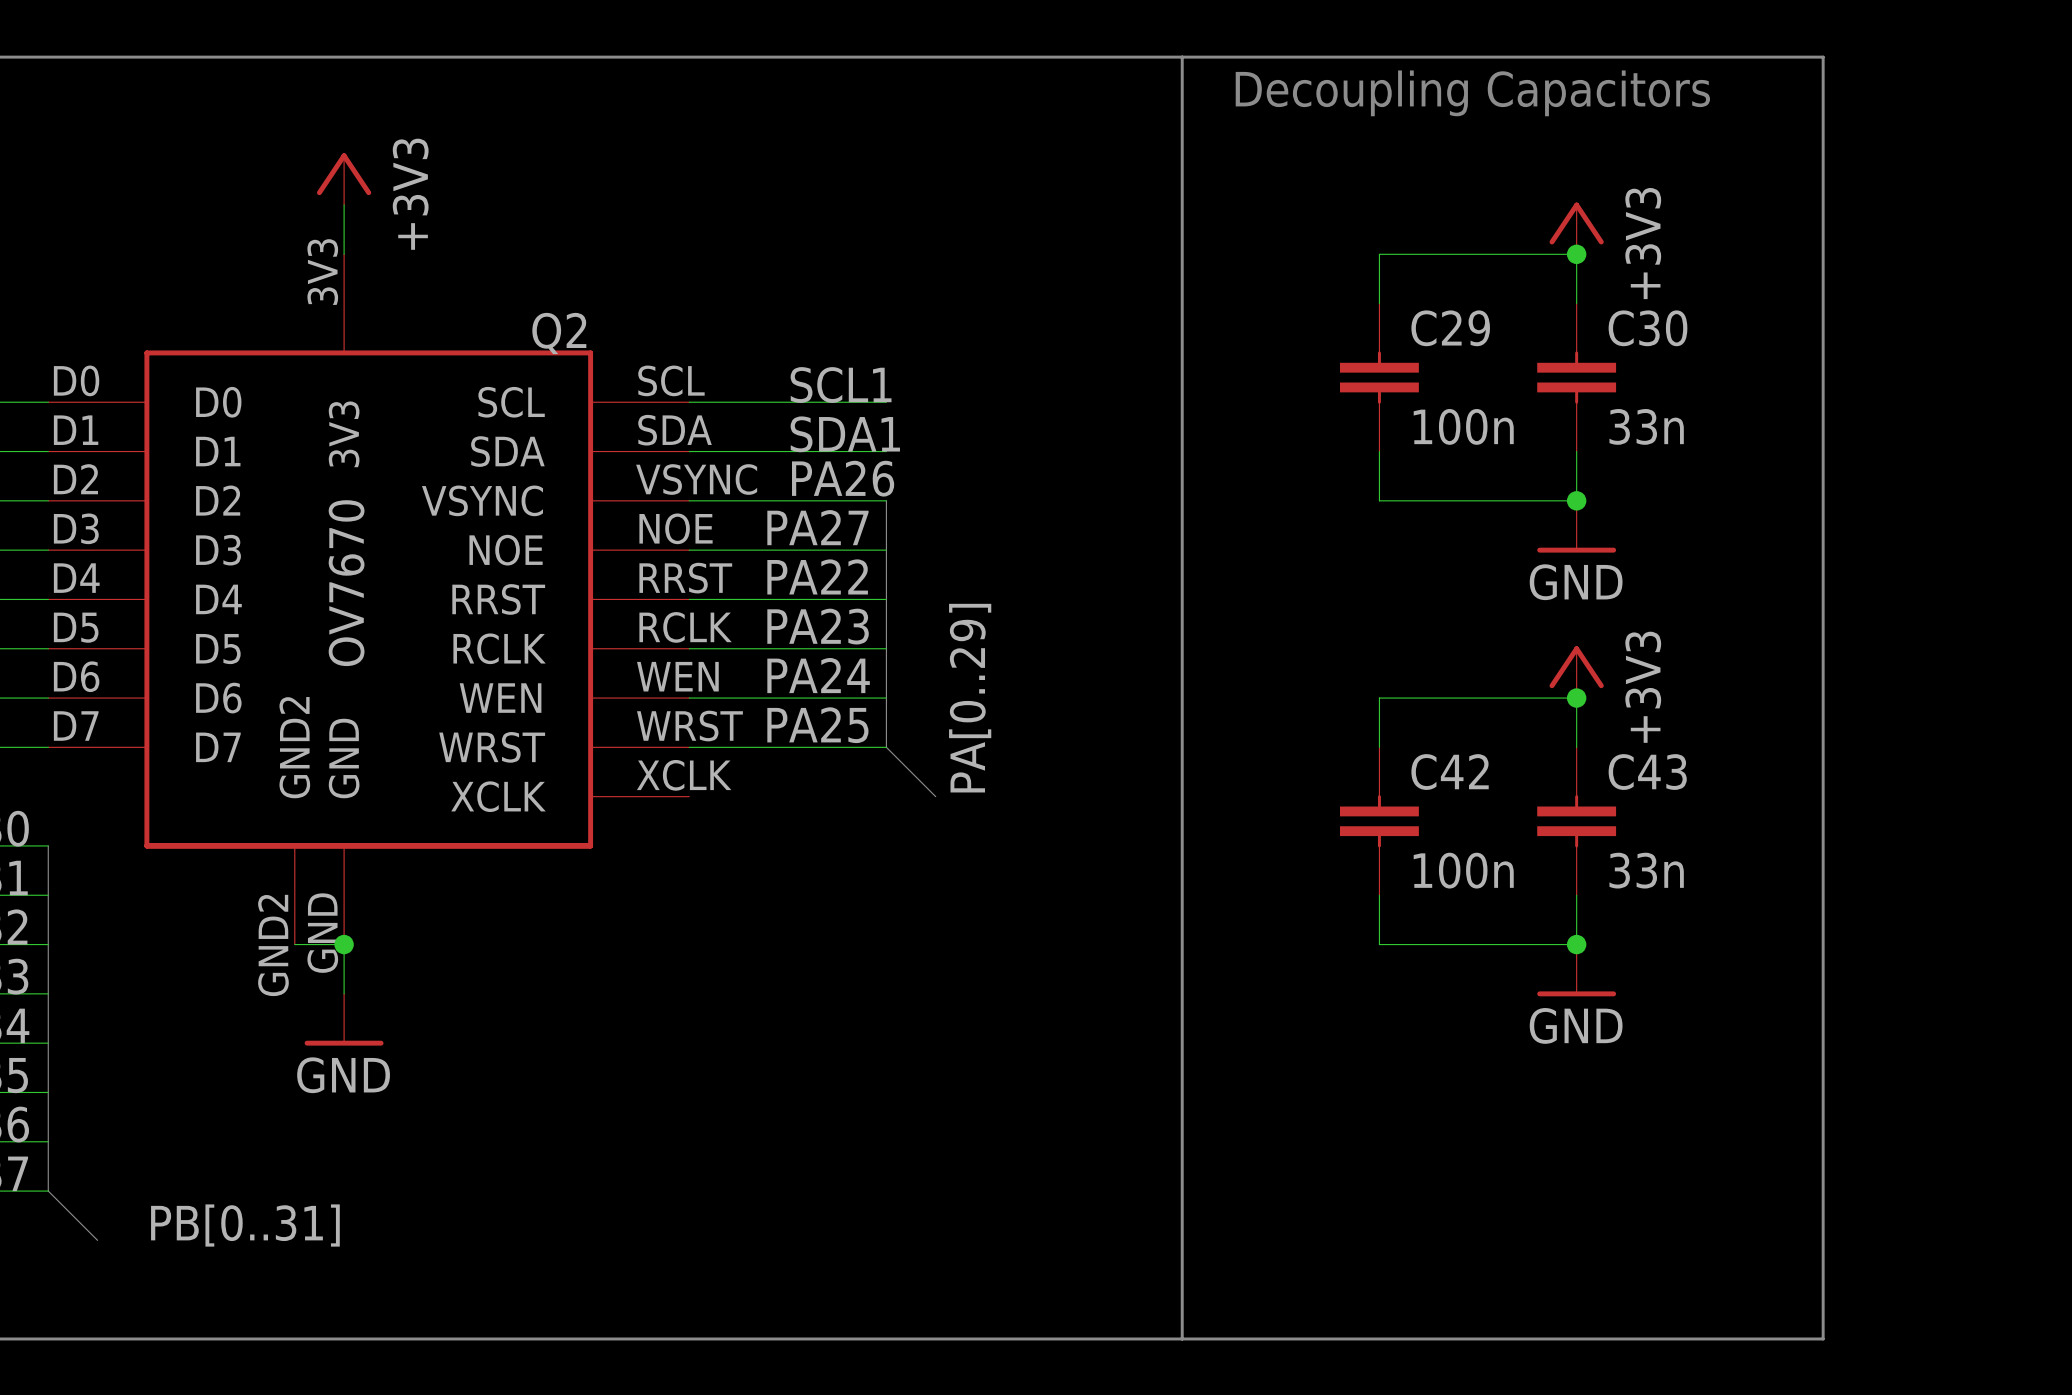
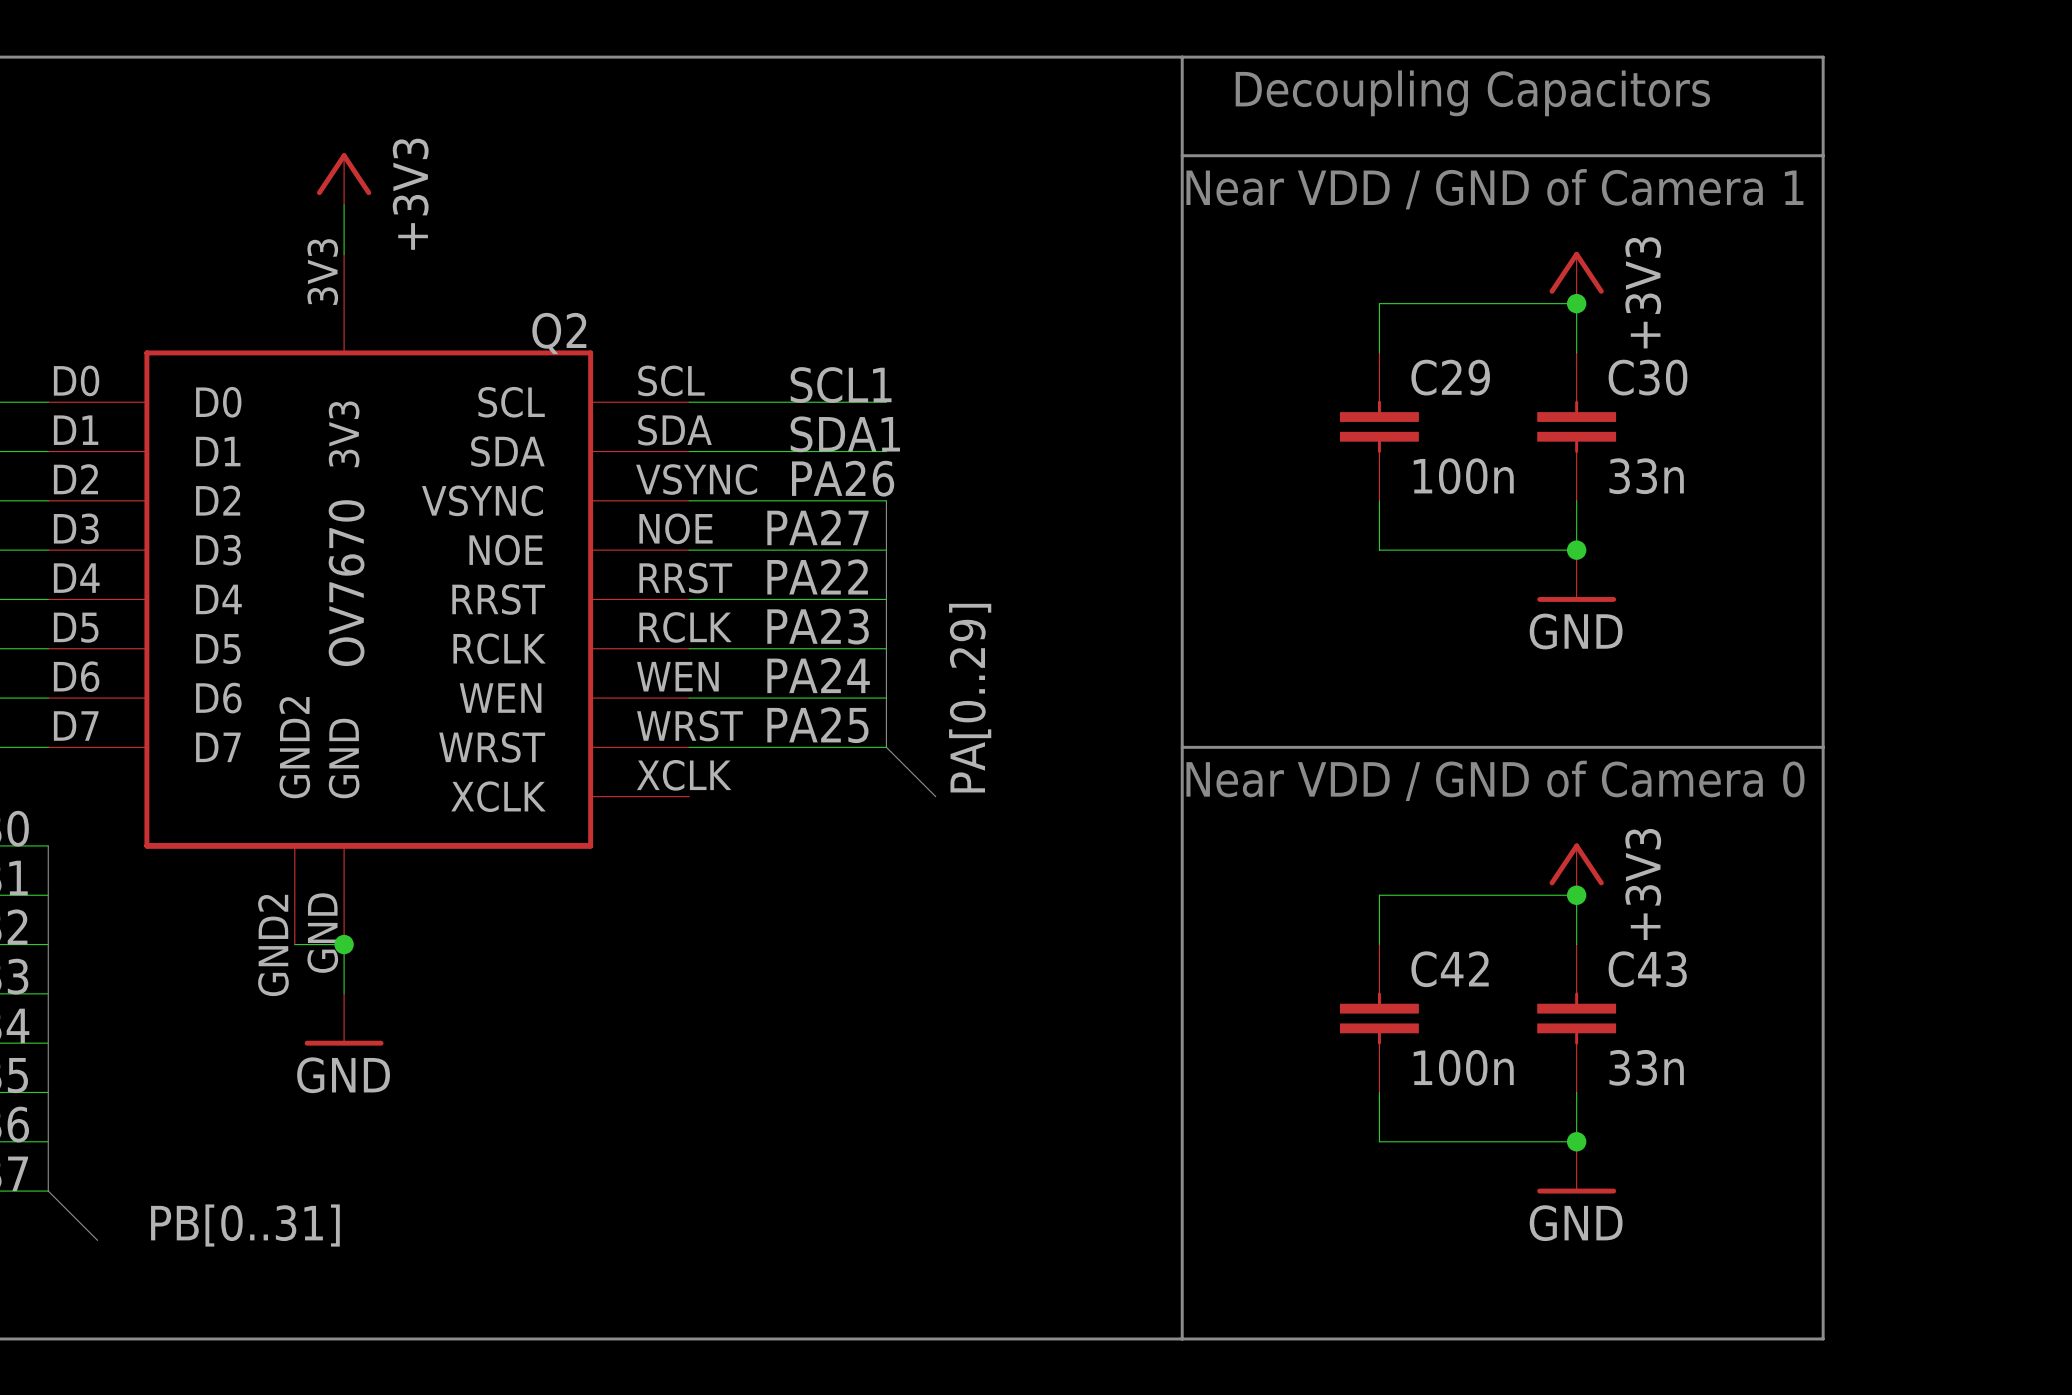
line: none -> (1182, 155) (1823, 155)
text: none -> Near VDD / GND of Camera 1 (1494, 189)
power symbol position: +3V3 (1576, 228) -> +3V3 (1576, 277)
junction position: (1576, 254) -> (1576, 303)
wire: (1379, 303) (1379, 254) (1576, 254) (1576, 303) -> (1379, 352) (1379, 303) (1576, 303) (1576, 352)
C29 position: (1379, 377) -> (1379, 426)
C30 position: (1576, 377) -> (1576, 426)
wire: (1379, 451) (1379, 500) (1576, 500) (1576, 451) -> (1379, 500) (1379, 550) (1576, 550) (1576, 500)
junction position: (1576, 500) -> (1576, 550)
power symbol position: GND (1576, 526) -> GND (1576, 576)
power symbol: +3V3 (1576, 672) -> none
junction: (1576, 698) -> none
line: none -> (1182, 747) (1823, 747)
wire: (1379, 747) (1379, 698) (1576, 698) (1576, 747) -> none
text: none -> Near VDD / GND of Camera 0 (1495, 780)
C42 position: (1379, 821) -> (1379, 1018)
C43 position: (1576, 821) -> (1576, 1018)
power symbol: none -> +3V3 (1576, 869)
wire: (1379, 944) (1576, 944) -> (1379, 895) (1576, 895)
junction position: (1576, 944) -> (1576, 895)
power symbol: GND (1576, 970) -> none
wire: none -> (1379, 1092) (1379, 1141) (1576, 1141) (1576, 1092)
junction: none -> (1576, 1141)
power symbol: none -> GND (1576, 1167)

